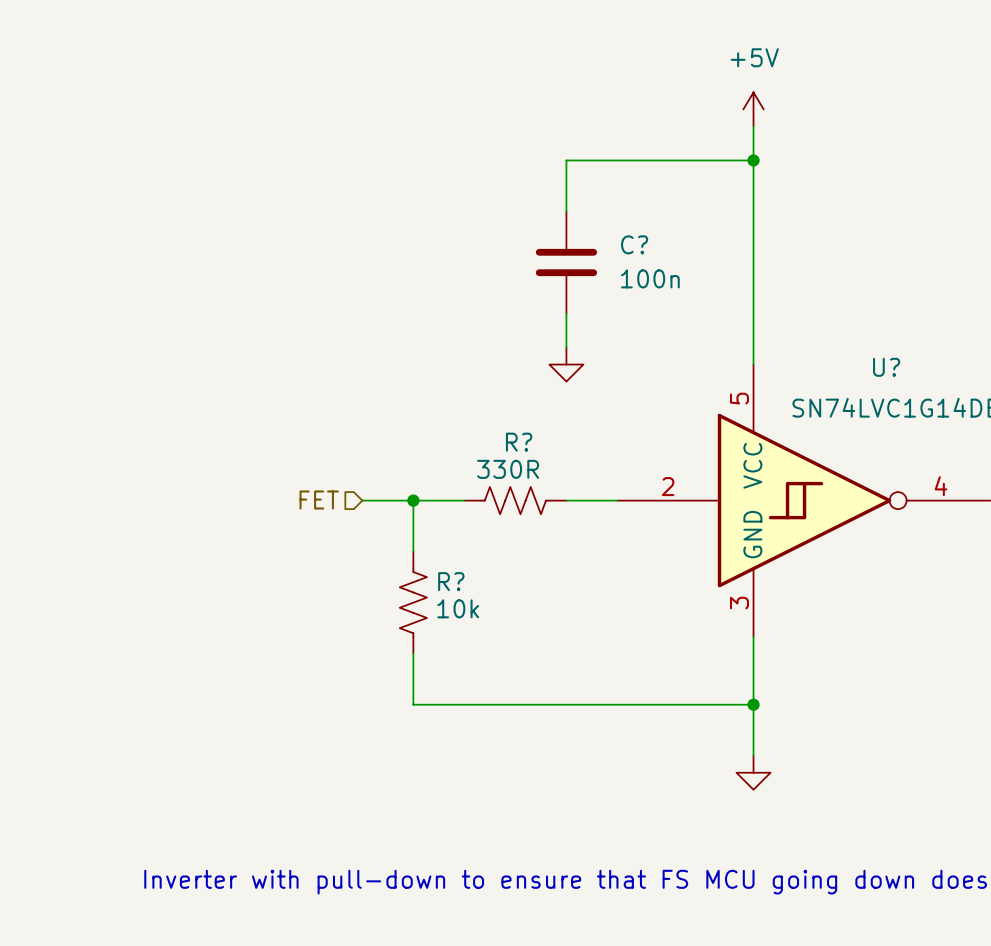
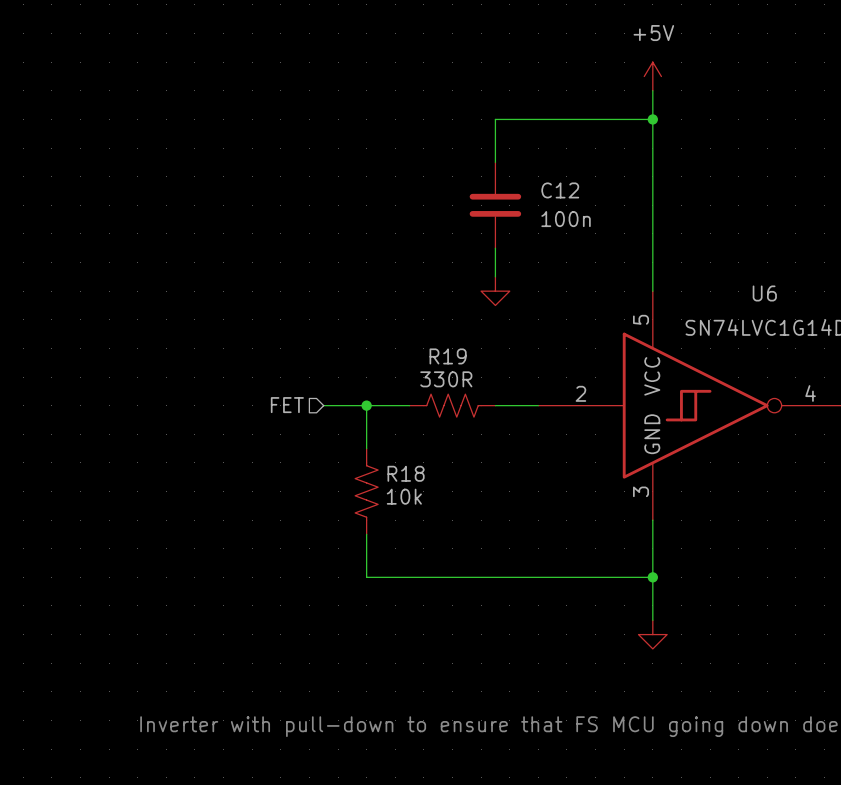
C? name: C? (634, 244) -> C12 (560, 190)
U? name: U? (886, 367) -> U6 (764, 293)
R? name: R? (519, 442) -> R19 (448, 356)
R? name: R? (451, 581) -> R18 (406, 473)

